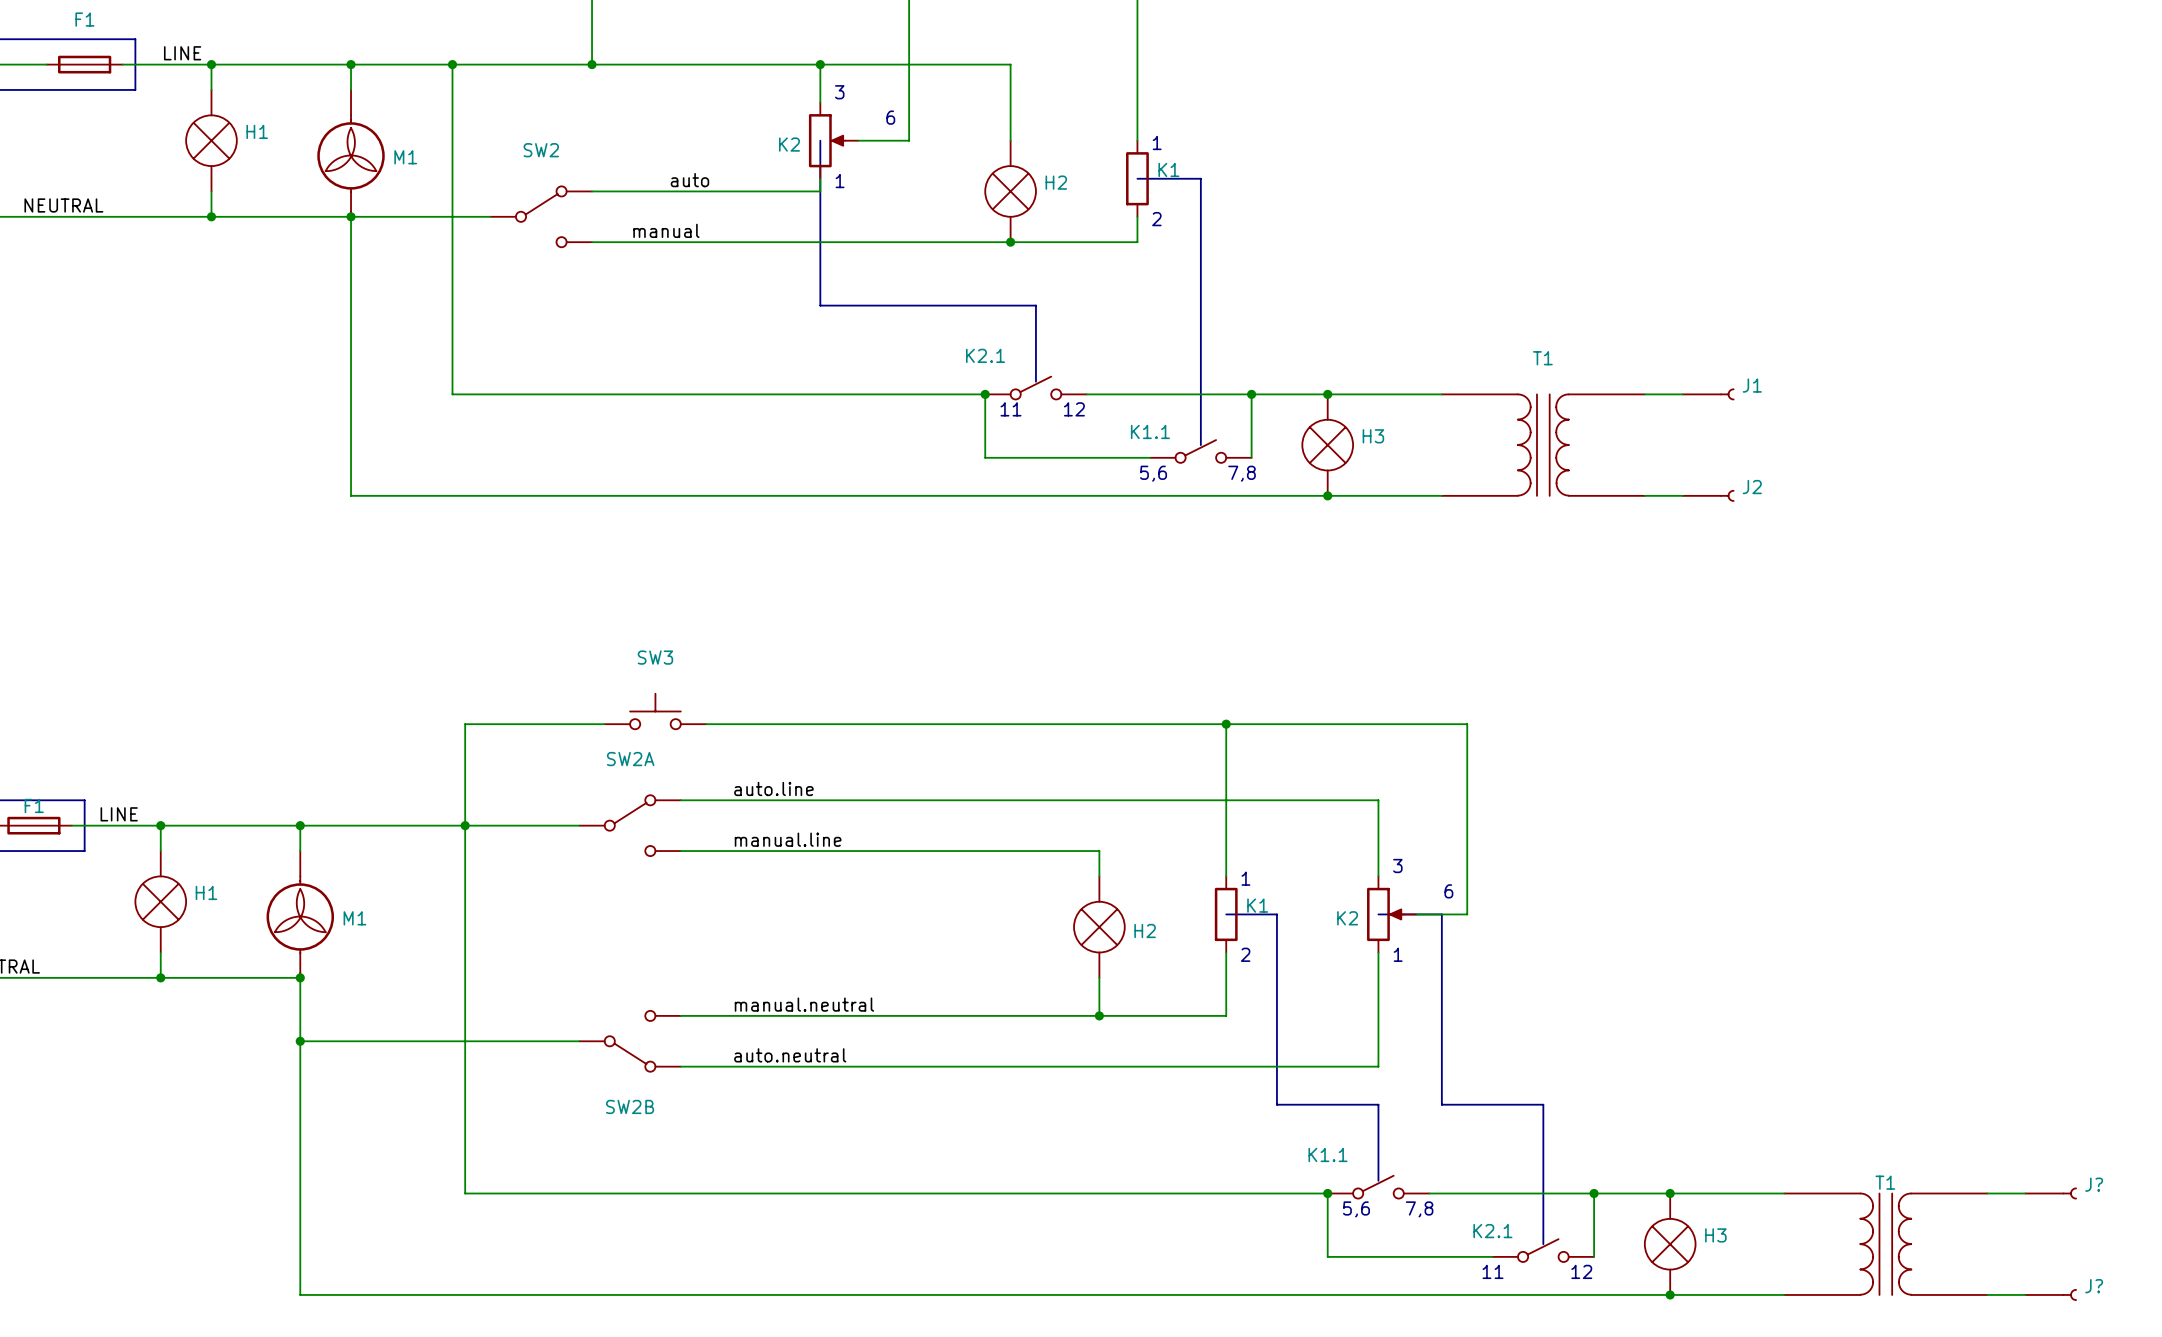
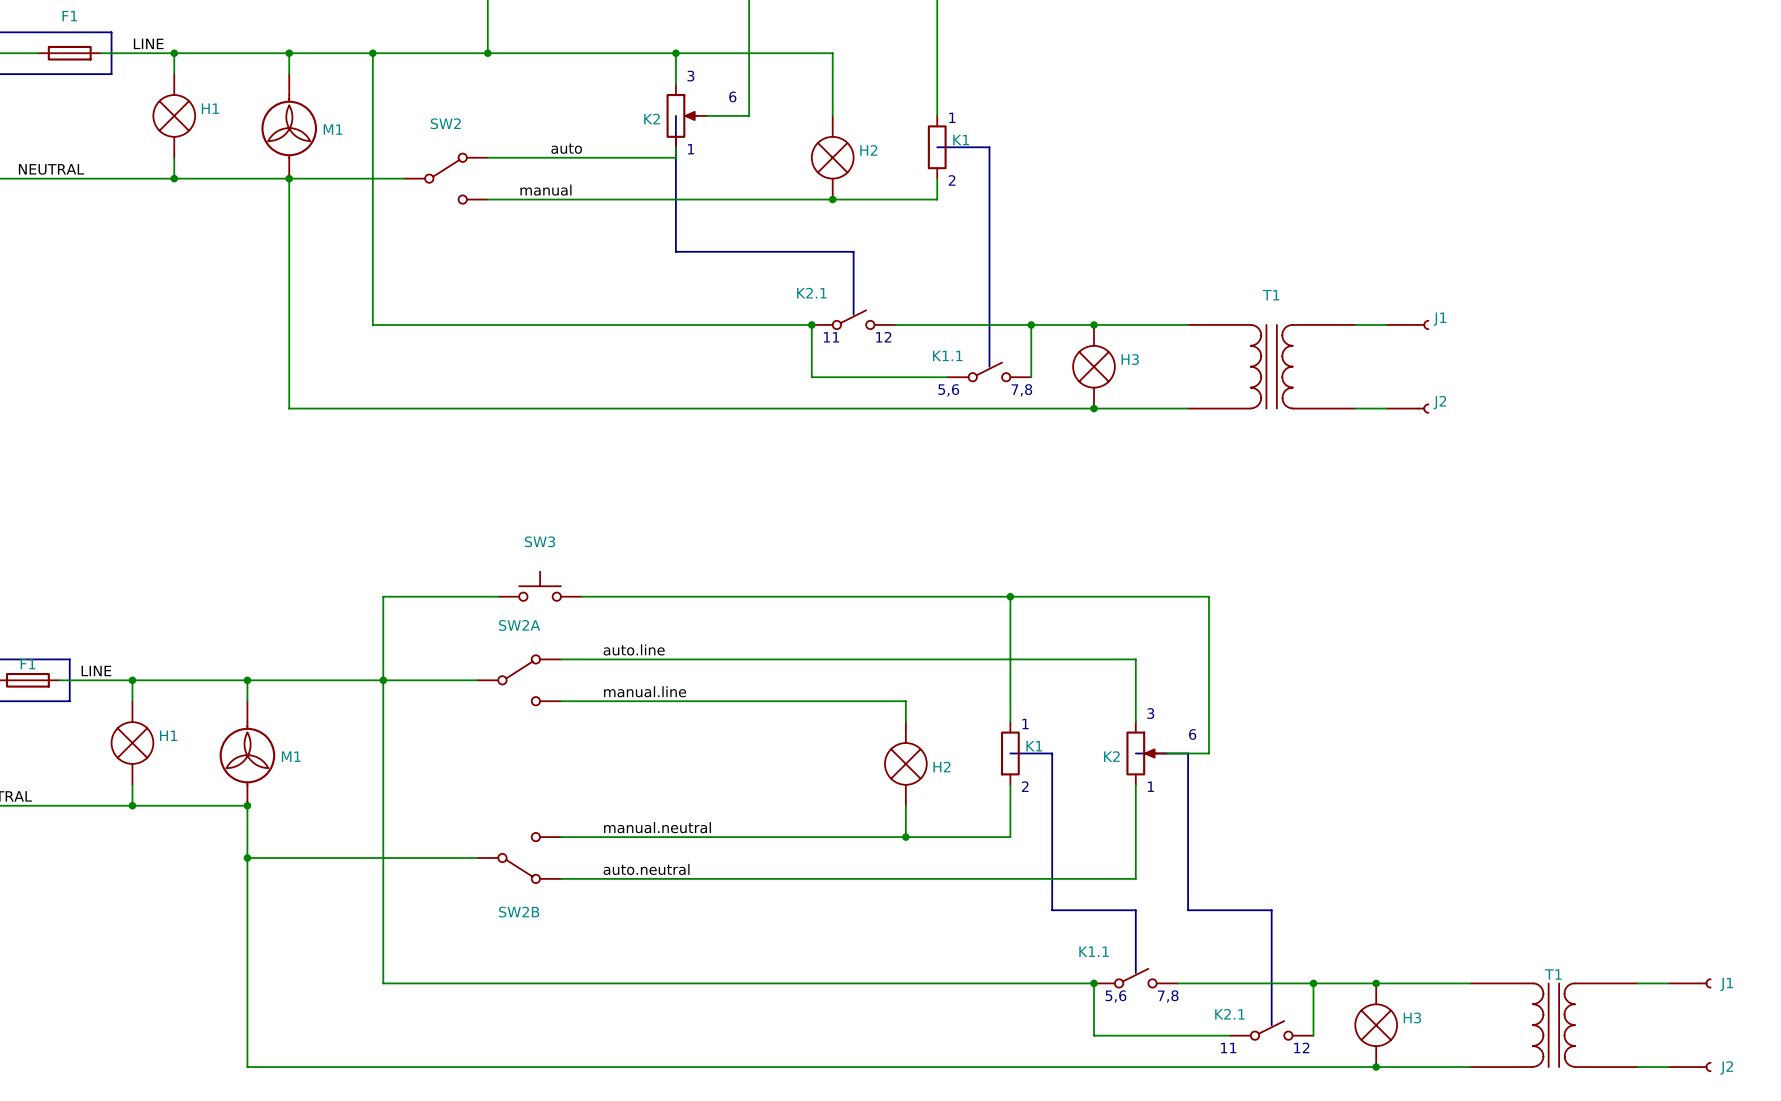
J? name: J? (2094, 1184) -> J1 (1726, 984)
J? name: J? (2094, 1286) -> J2 (1726, 1067)

